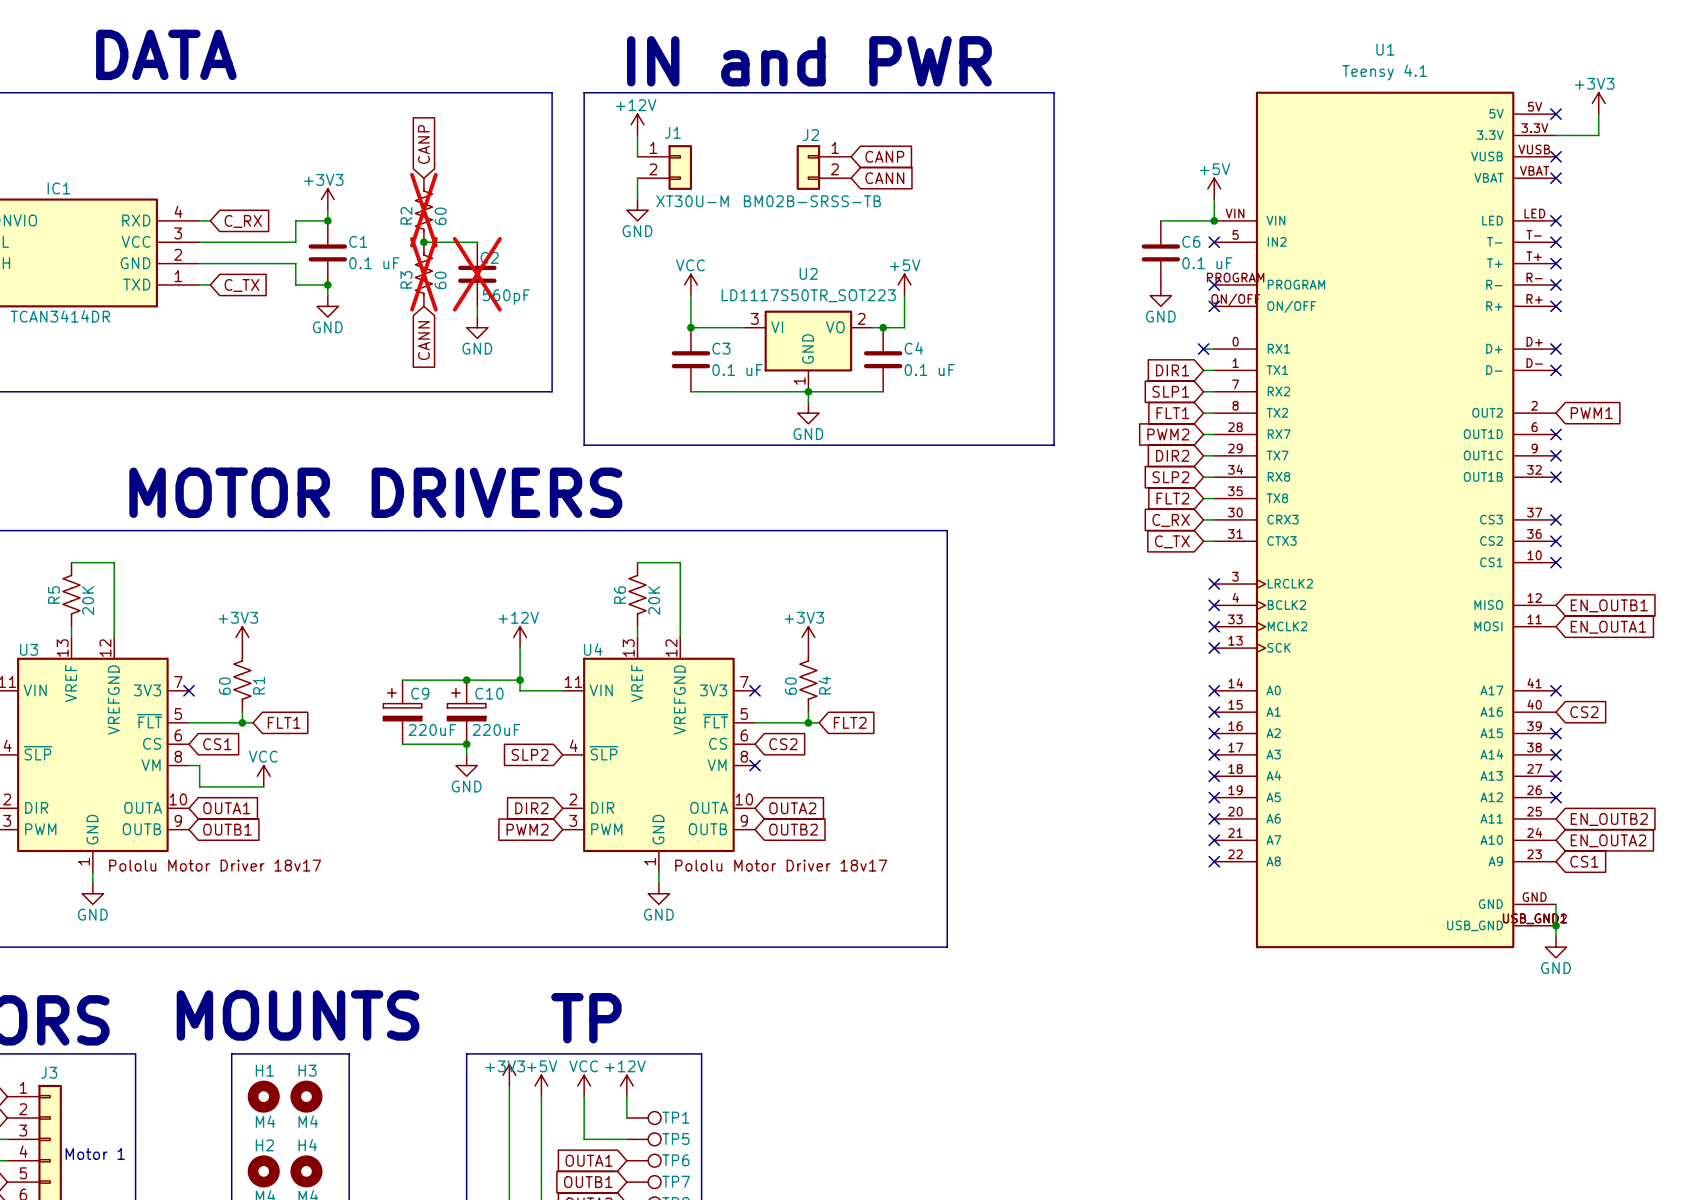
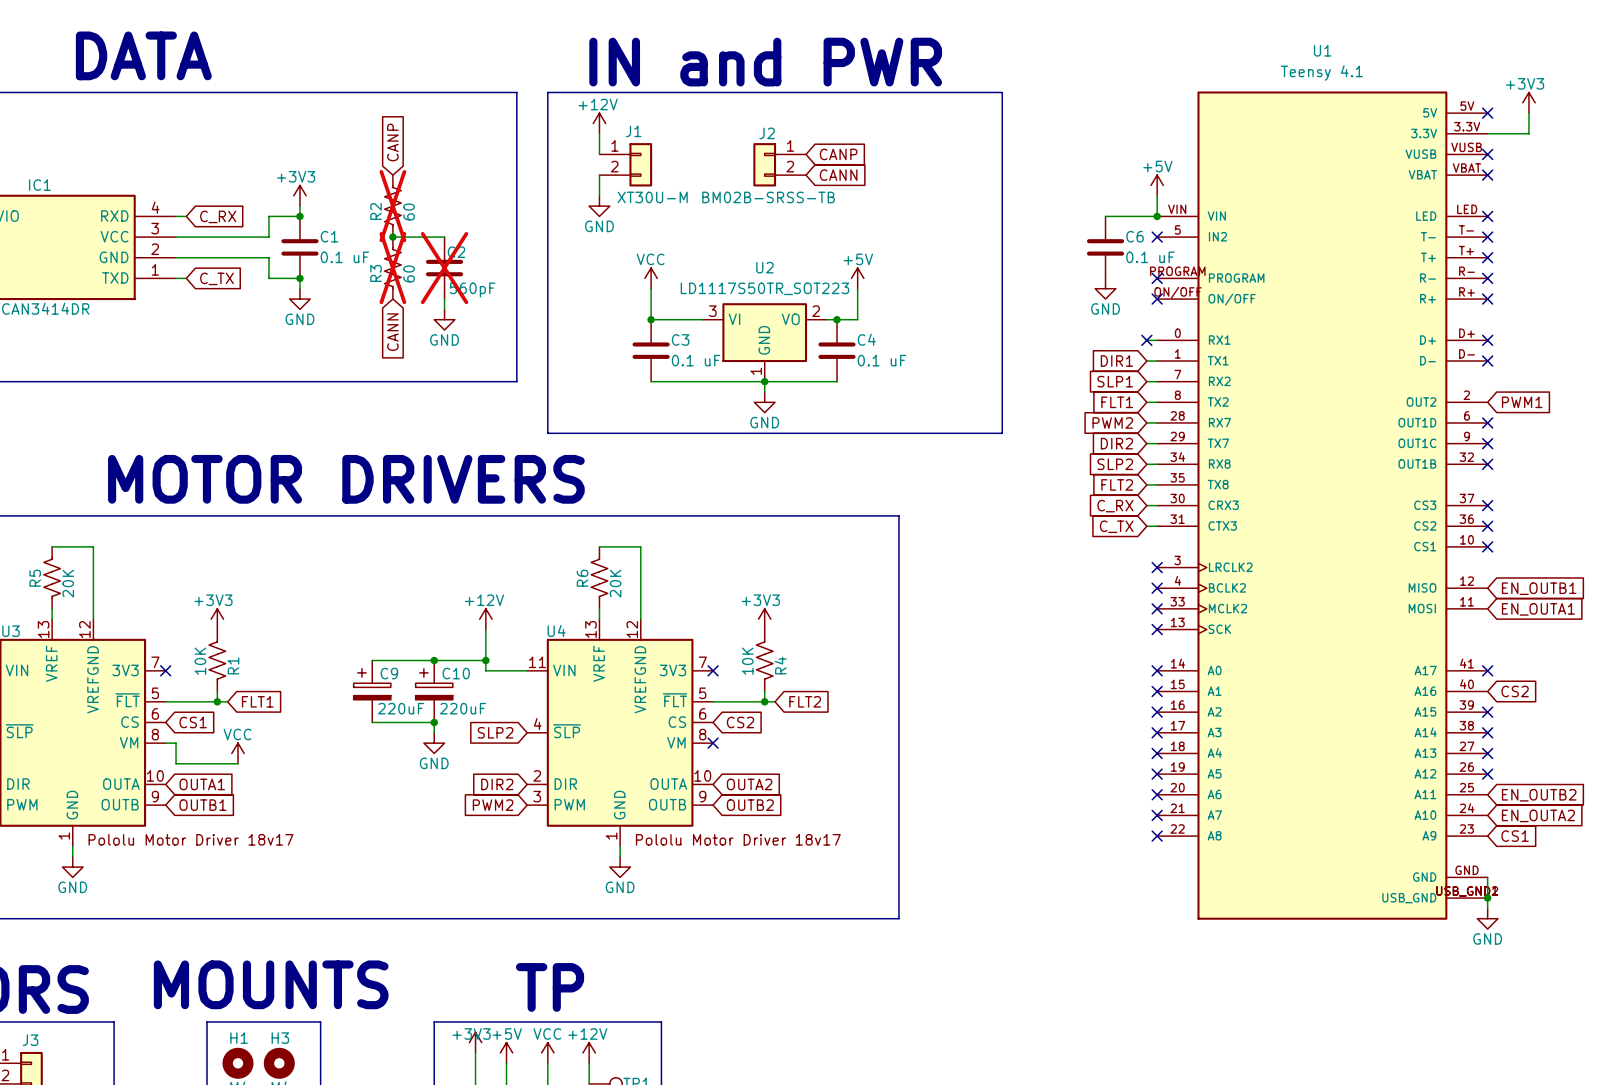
R1 value: 60 (224, 686) -> 10K (200, 661)
R4 value: 60 (790, 686) -> 10K (747, 661)

